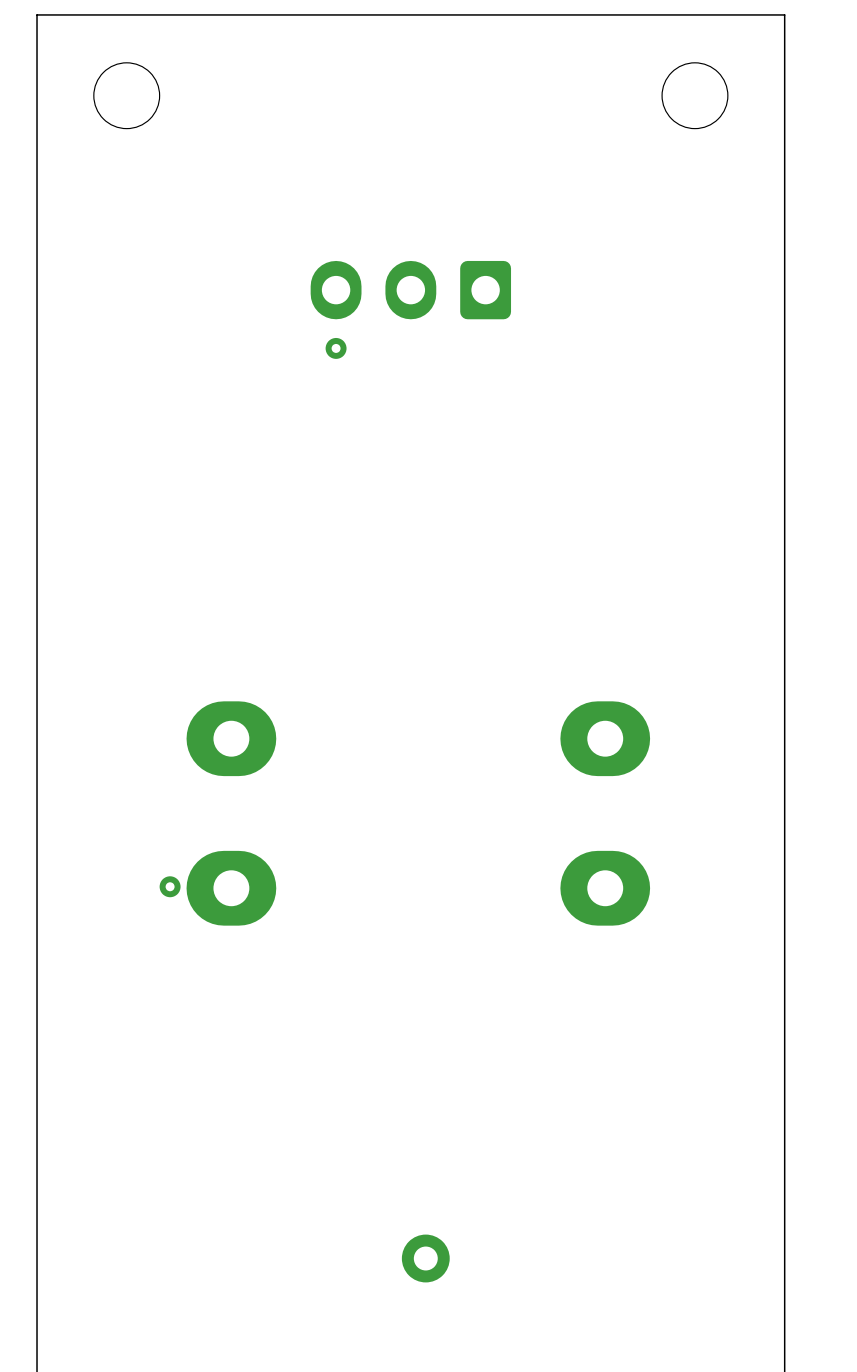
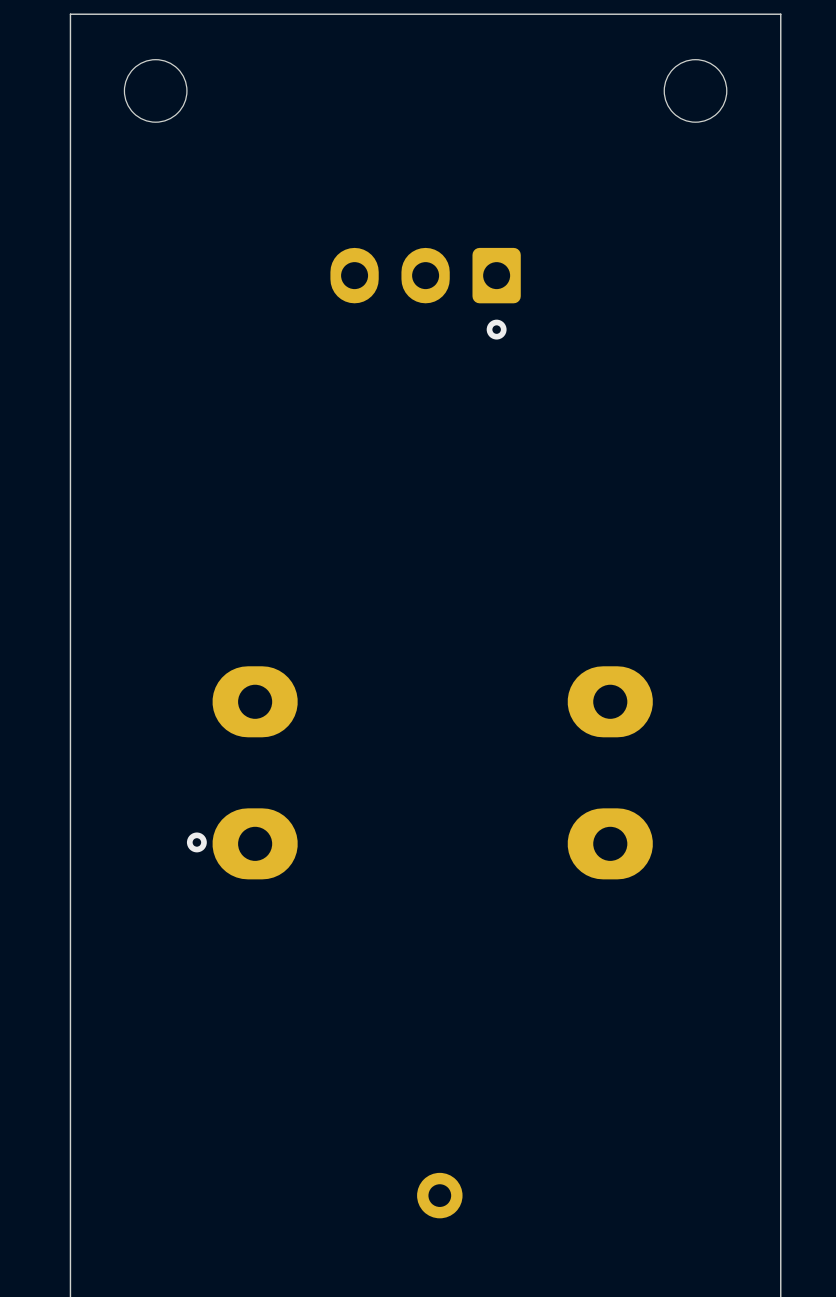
via position: (336, 348) -> (496, 329)

